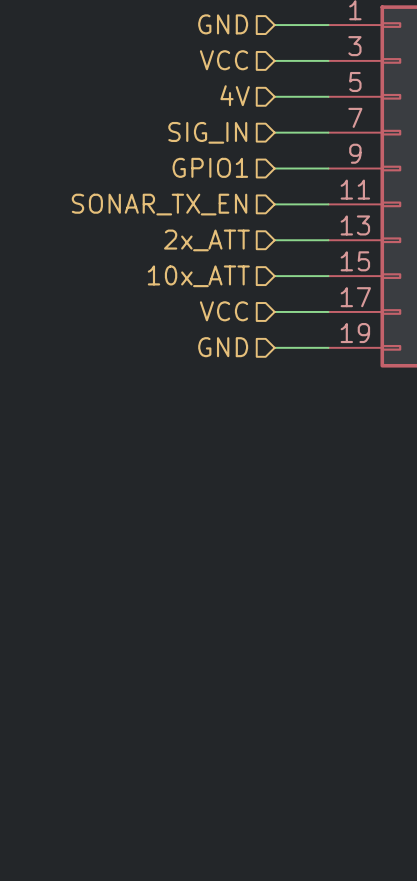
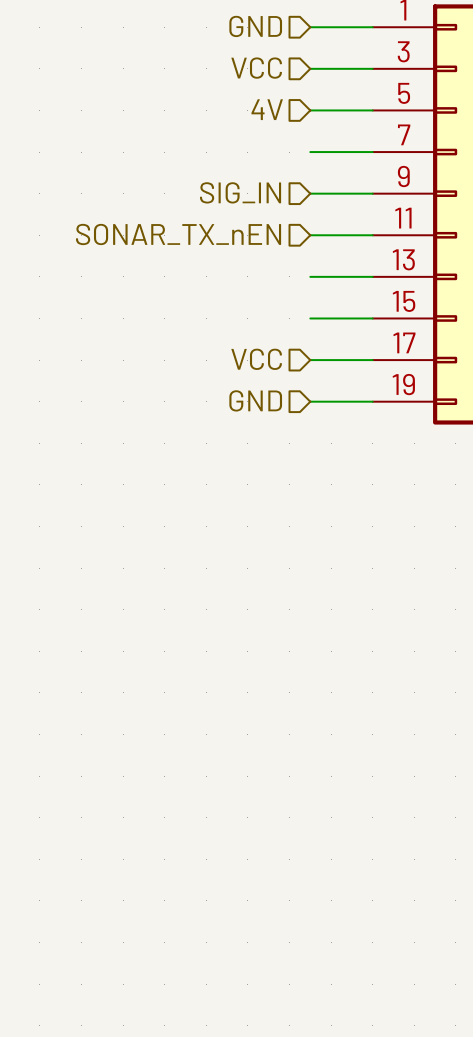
hierarchical label: SIG_IN (207, 132) -> none
hierarchical label: GPIO1 (210, 167) -> SIG_IN (240, 192)
hierarchical label: SONAR_TX_EN (159, 204) -> SONAR_TX_nEN (178, 234)
hierarchical label: 2x_ATT (206, 240) -> none
hierarchical label: 10x_ATT (198, 276) -> none

